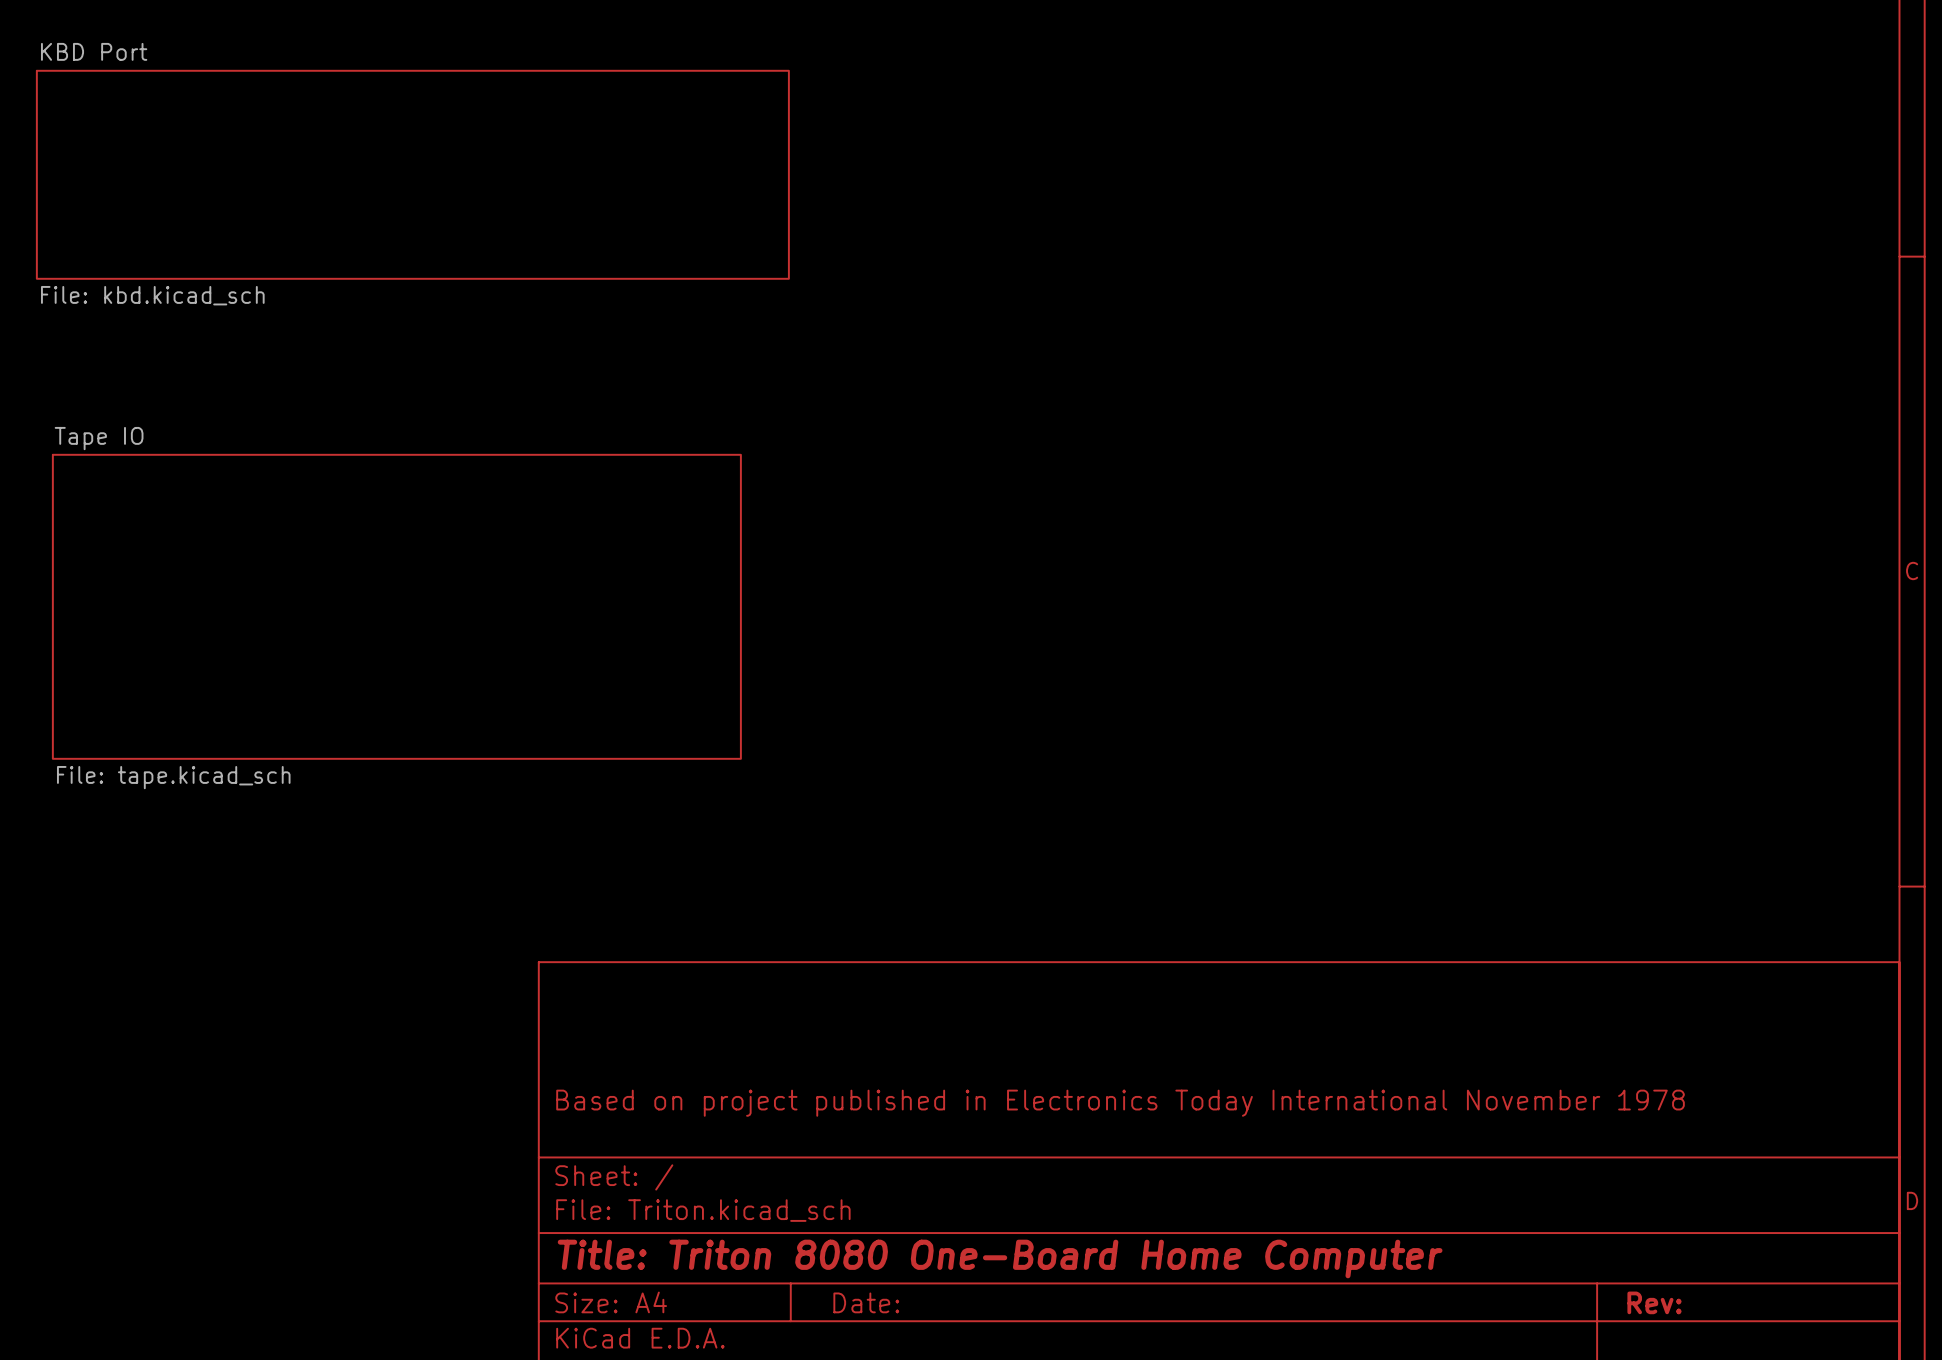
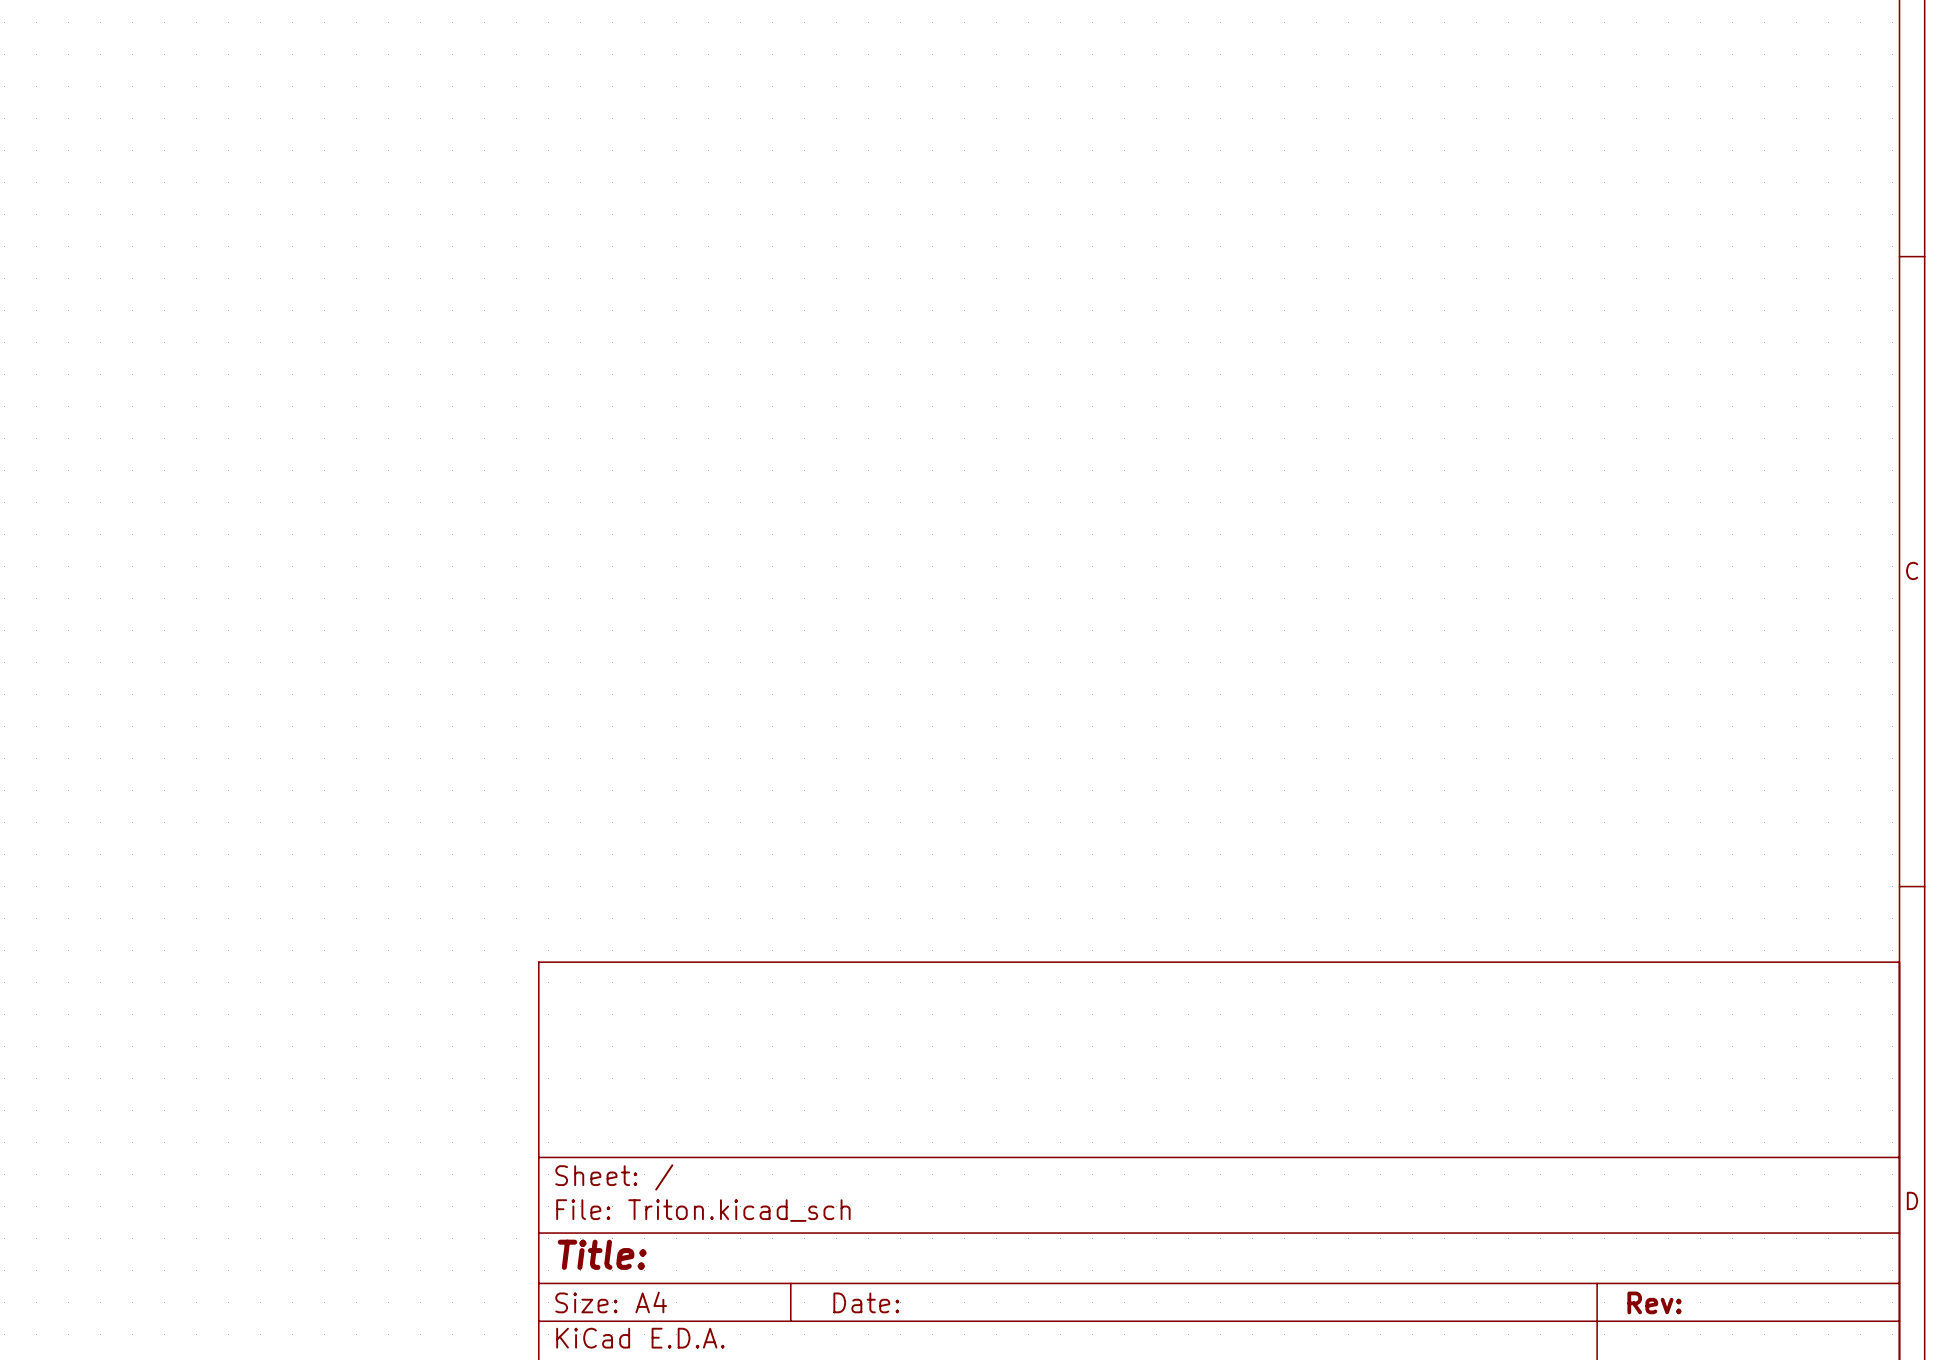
sheet KBD Port: File: kbd.kicad_sch (412, 174) -> none
sheet Tape IO: File: tape.kicad_sch (396, 606) -> none
title block: Based on project published in Electronics Today International November 1978 (1120, 1103) -> none
title block: Title: Triton 8080 One-Board Home Computer (1000, 1258) -> Title: (602, 1254)

